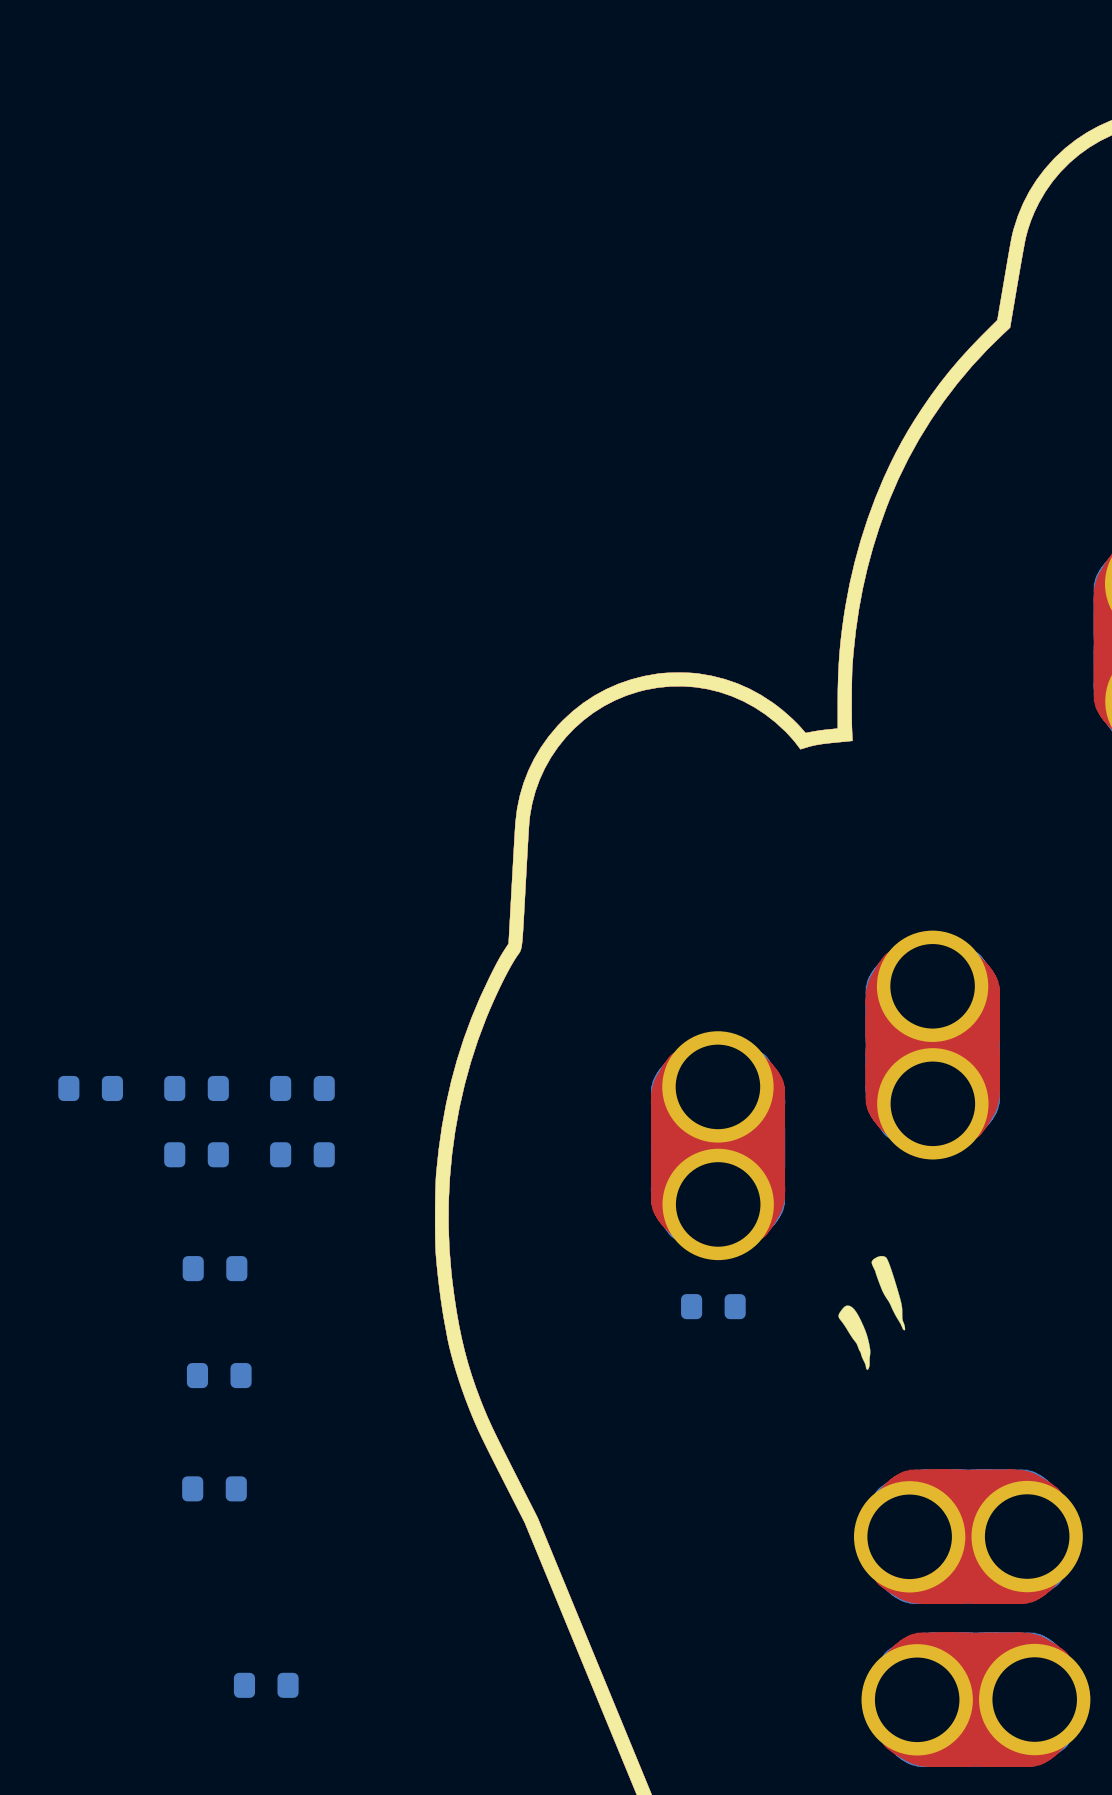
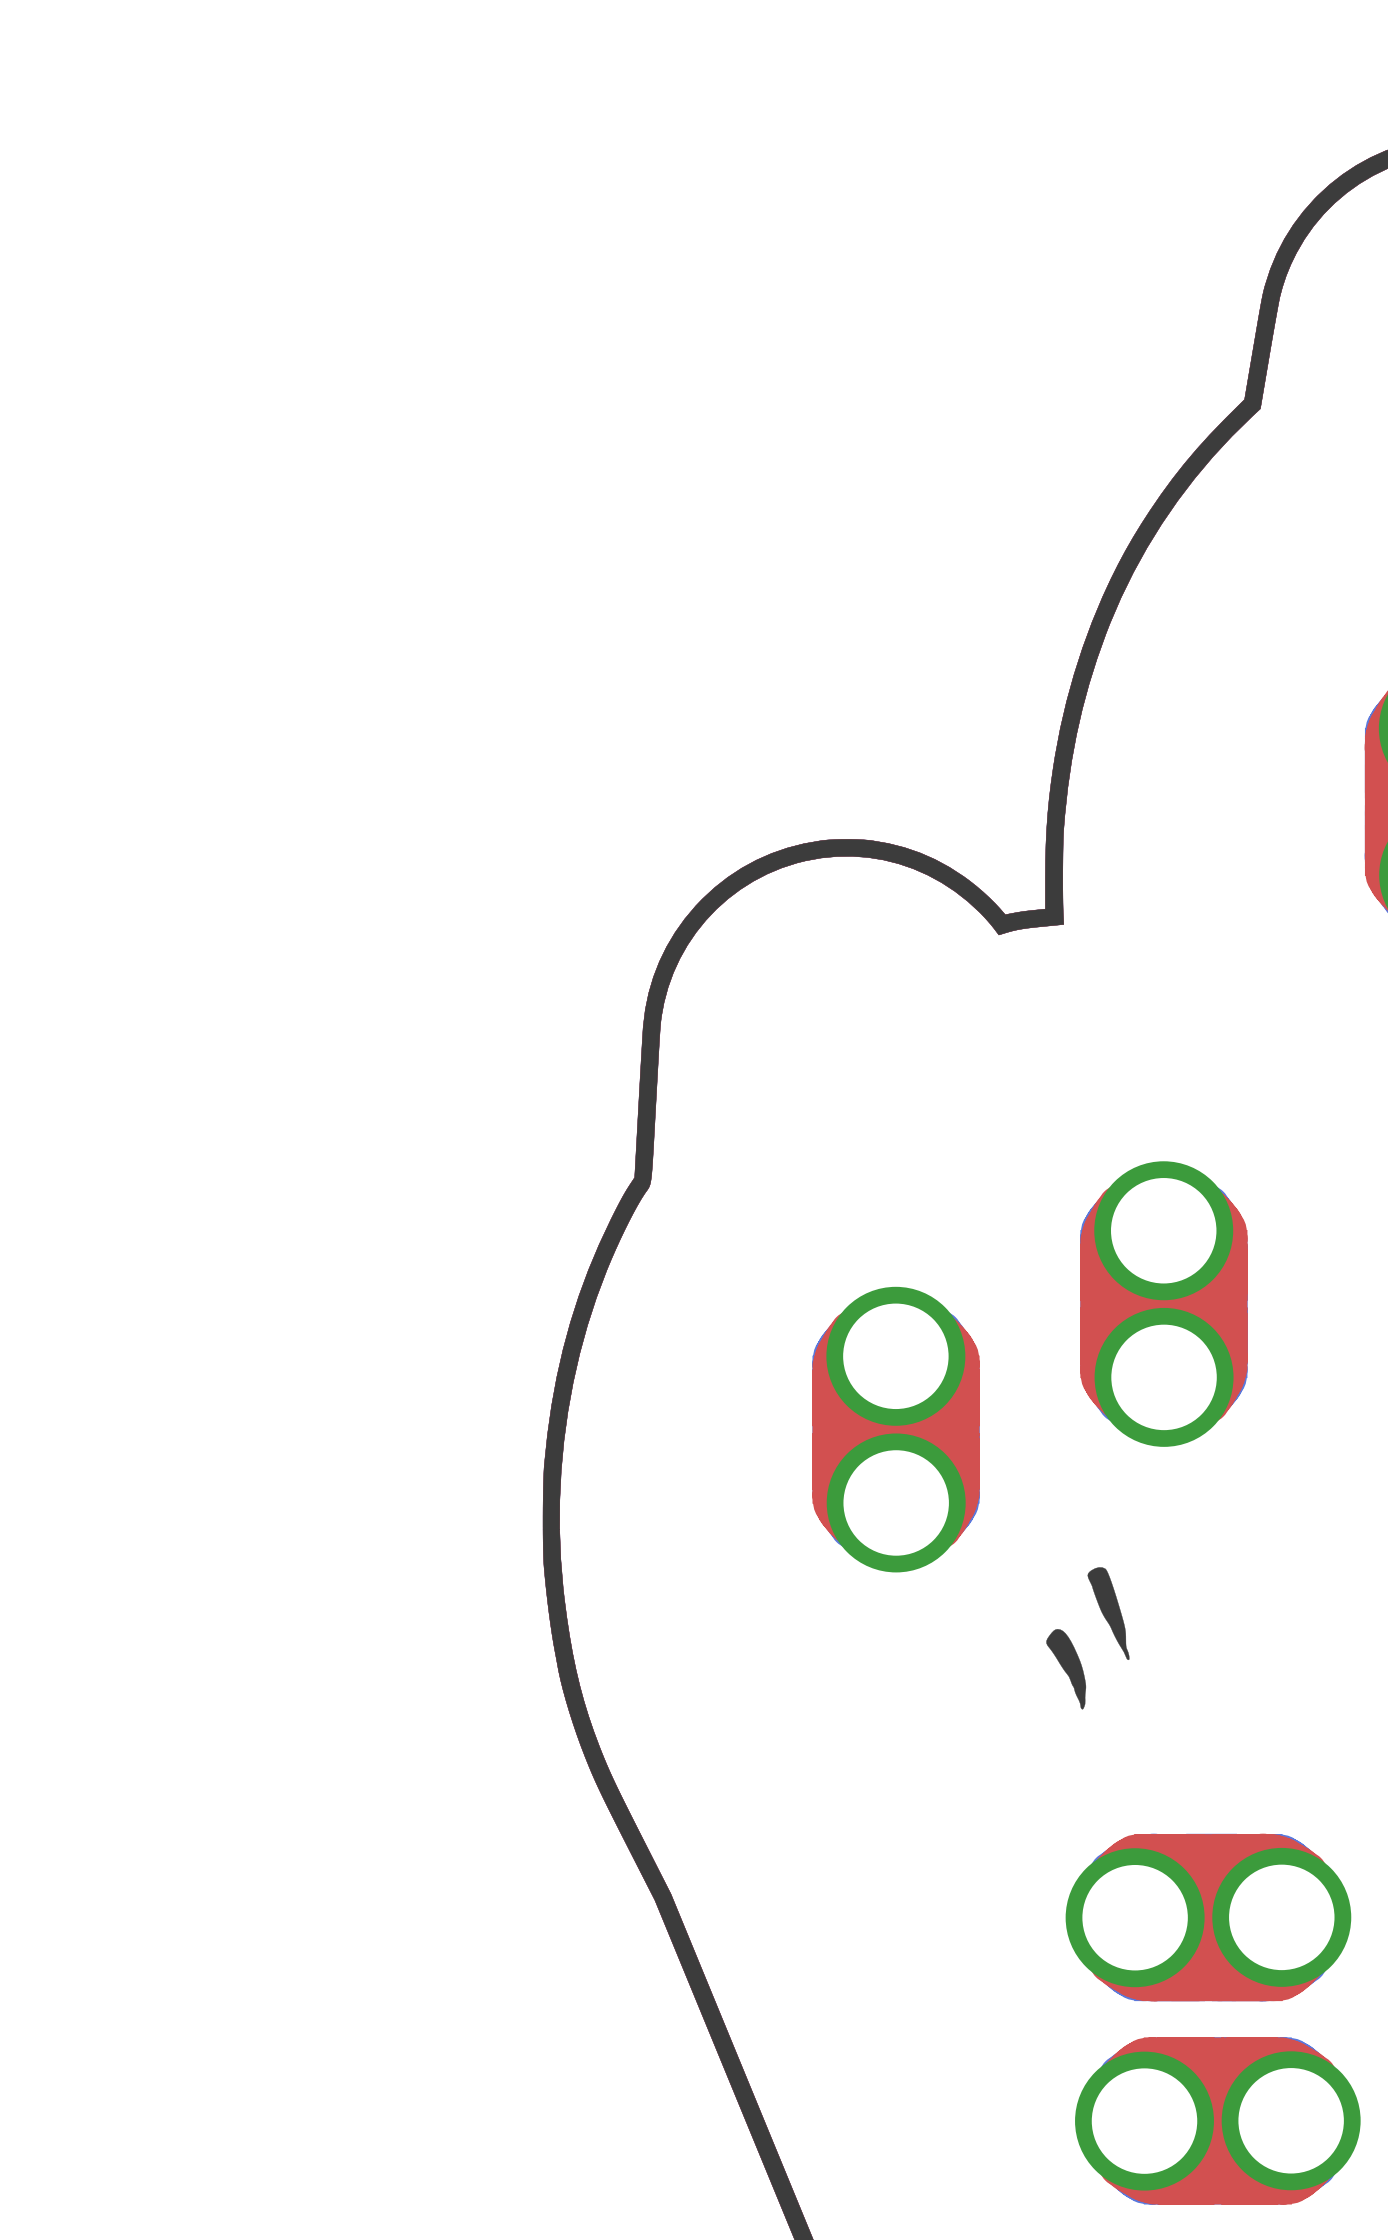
part: (90, 1088) -> none
part: (196, 1088) -> none
part: (302, 1088) -> none
part: (196, 1154) -> none
part: (302, 1154) -> none
part: (215, 1268) -> none
part: (713, 1306) -> none
part: (219, 1375) -> none
part: (214, 1488) -> none
part: (266, 1685) -> none

